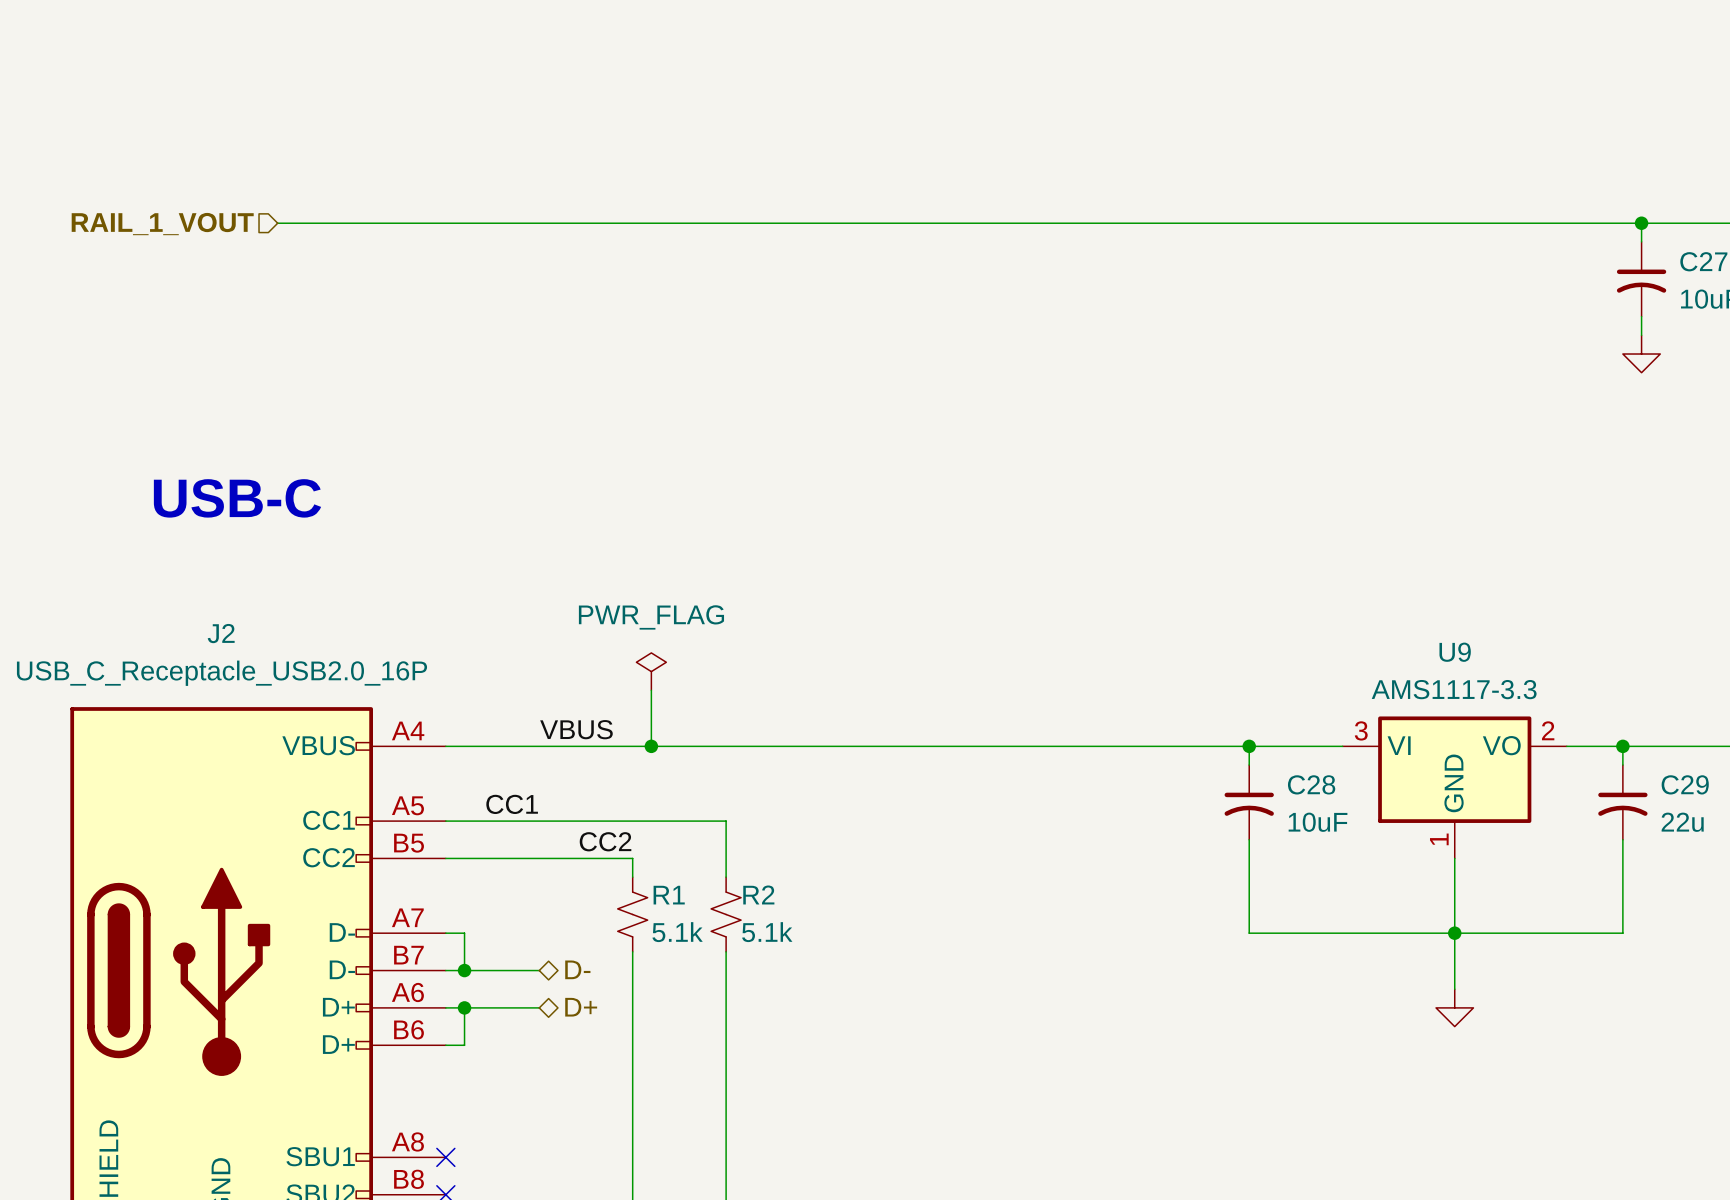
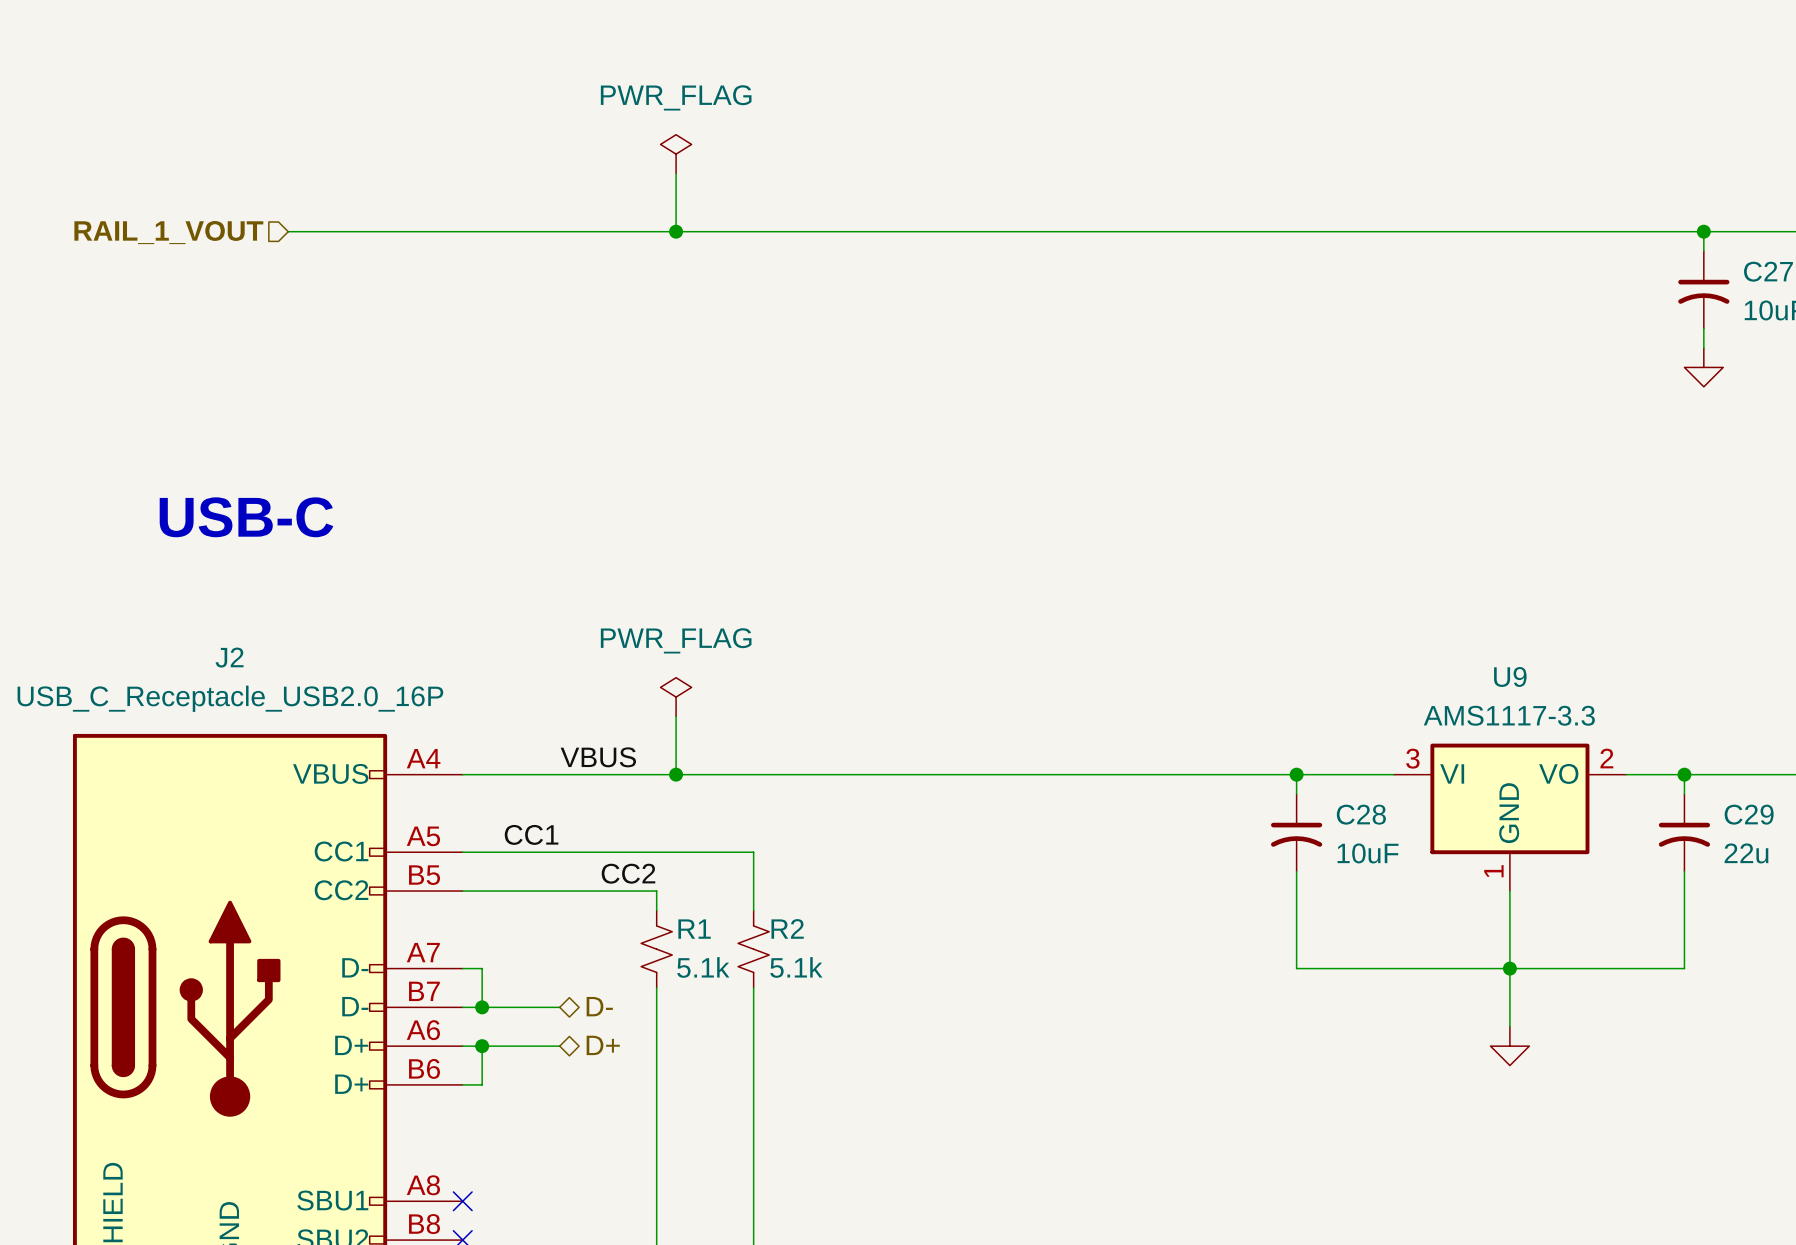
power symbol: none -> PWR_FLAG (676, 154)
wire: none -> (676, 173) (676, 231)
junction: none -> (676, 231)

